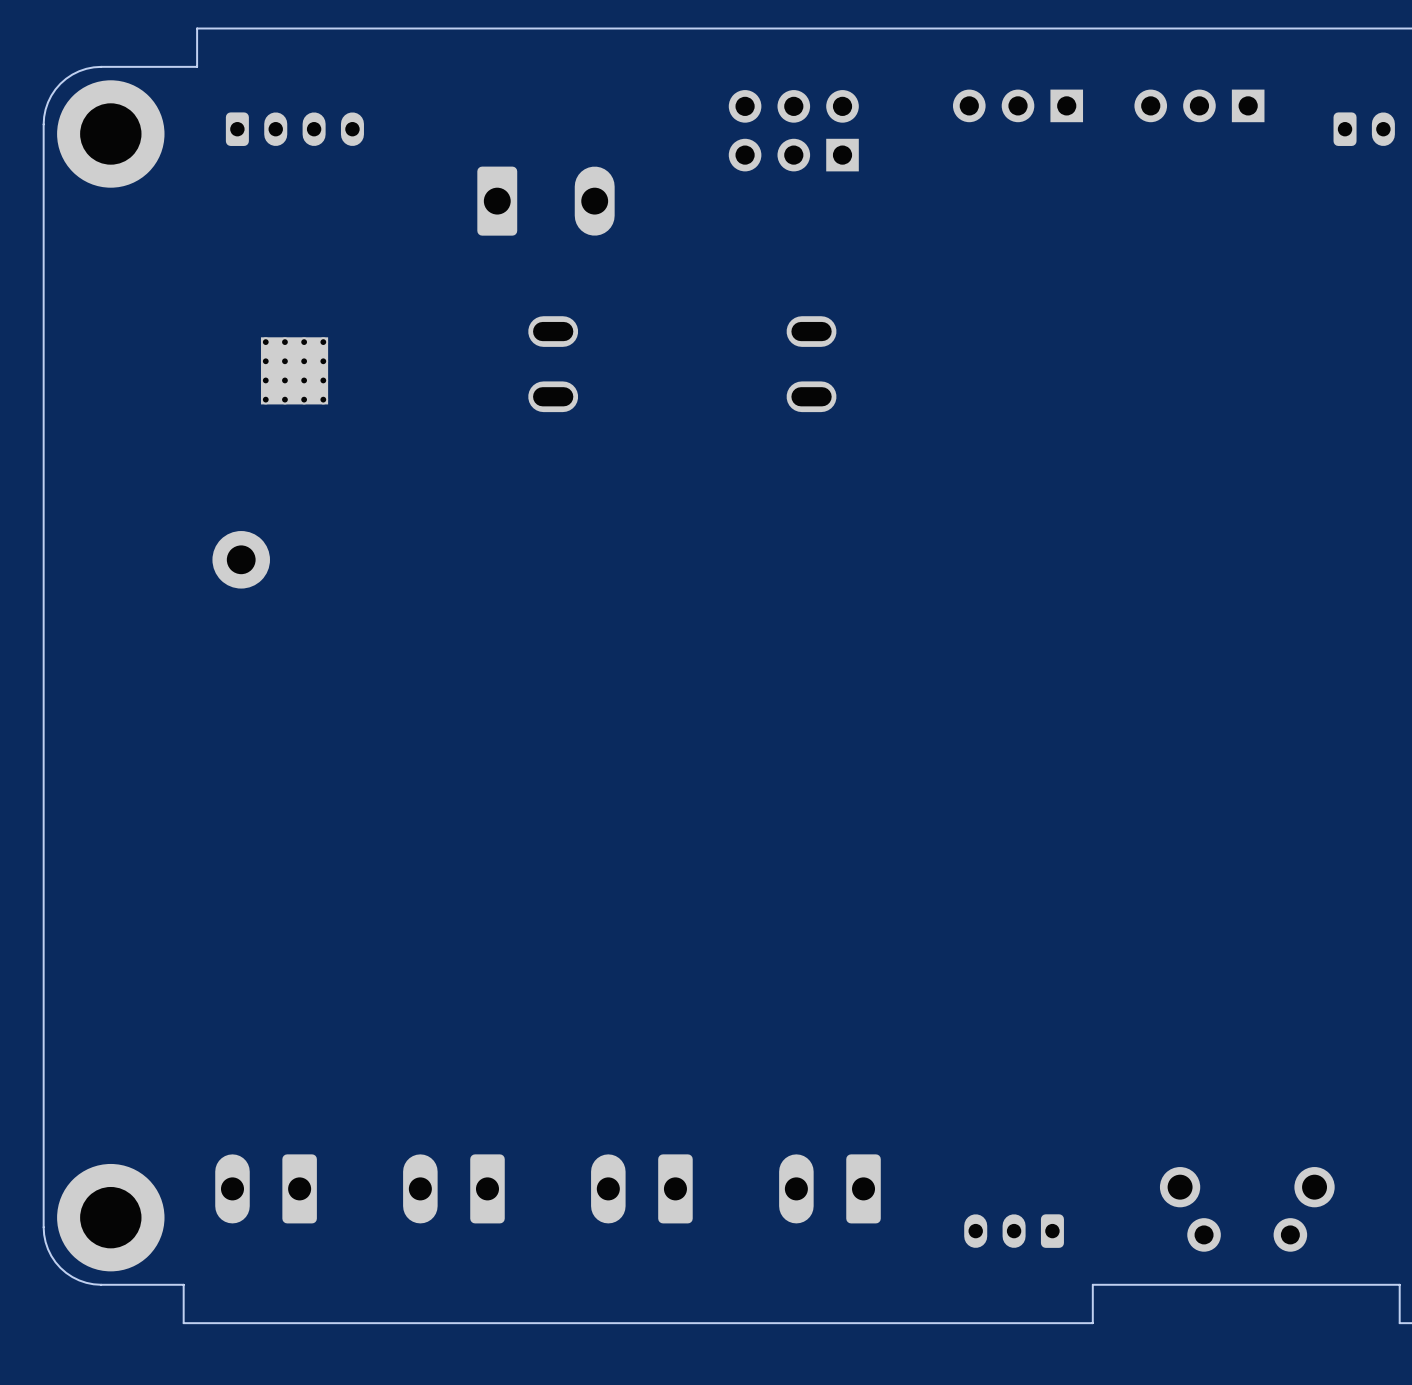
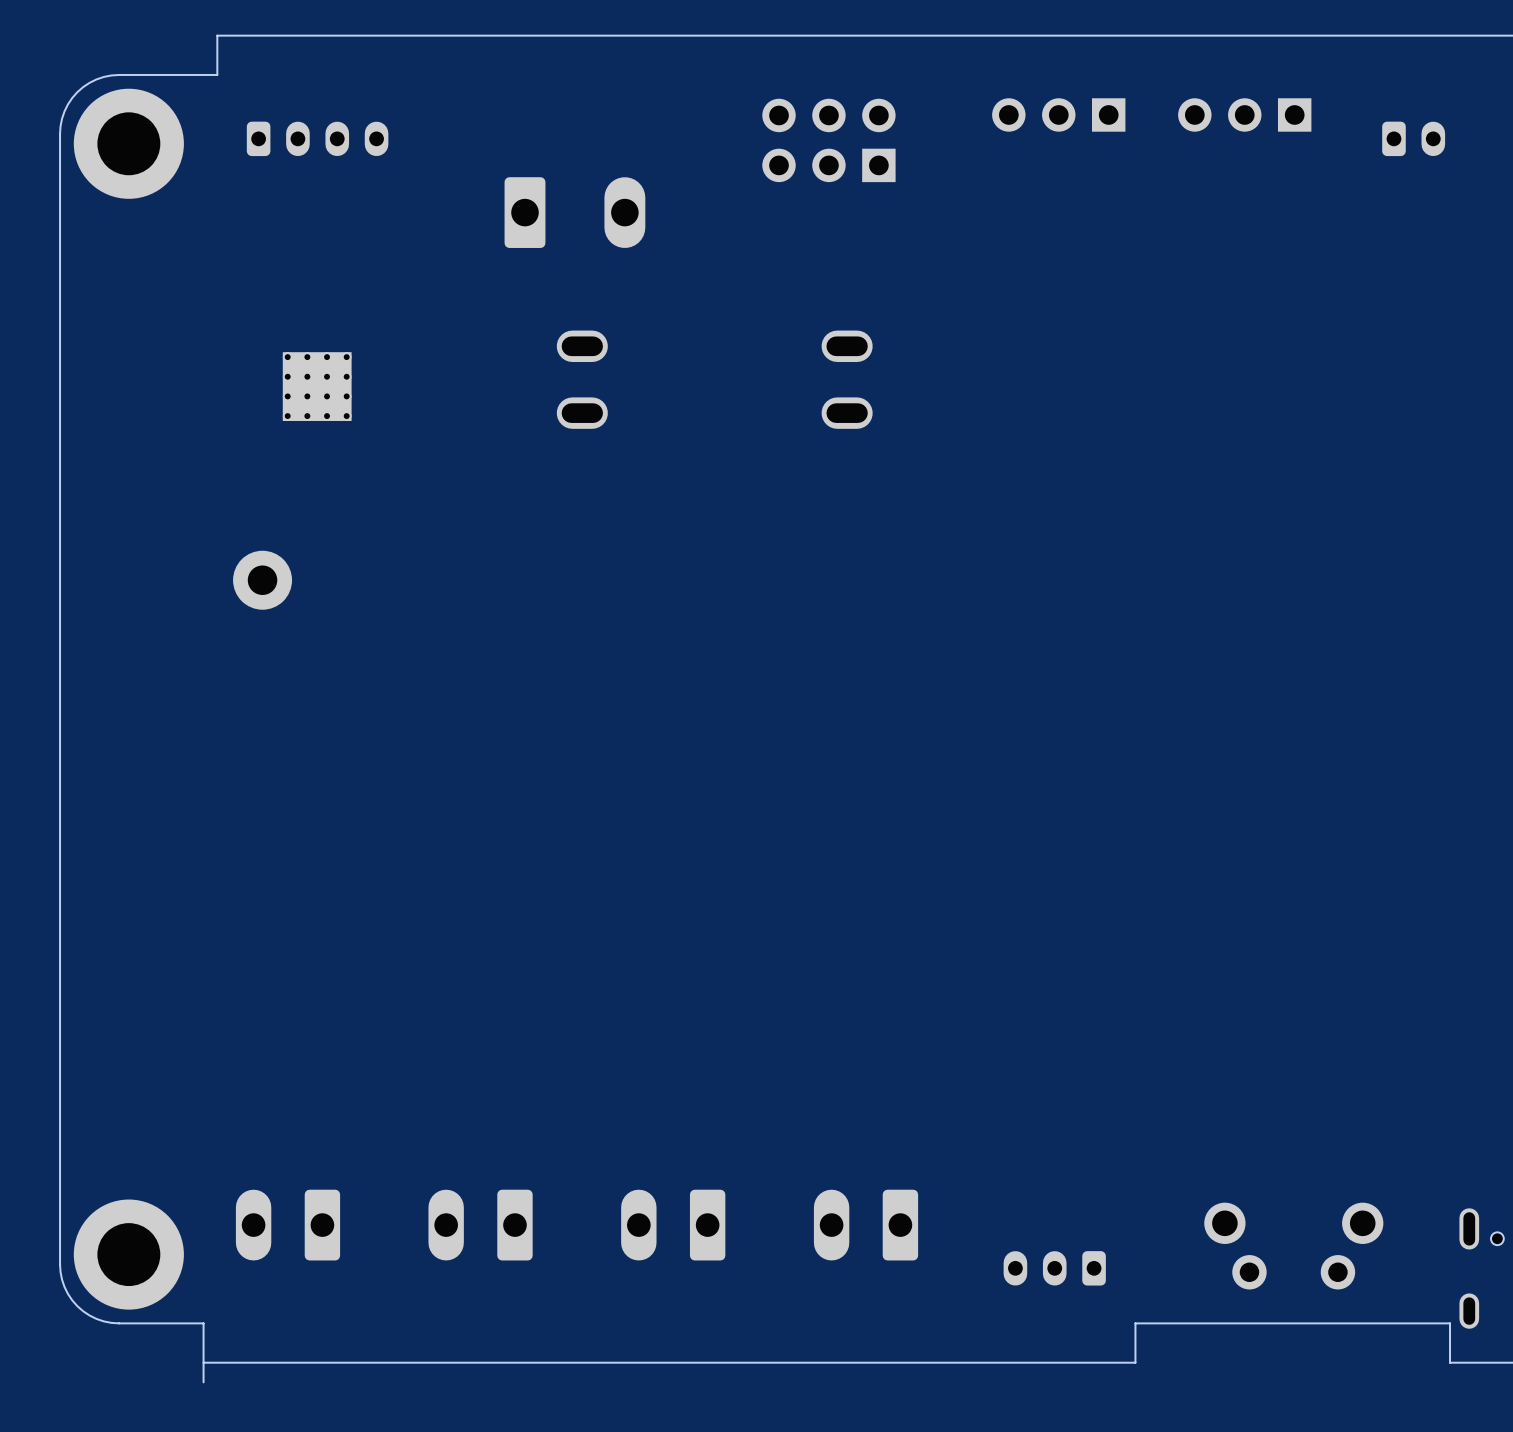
board edge: none -> (203, 1362) (203, 1382)

